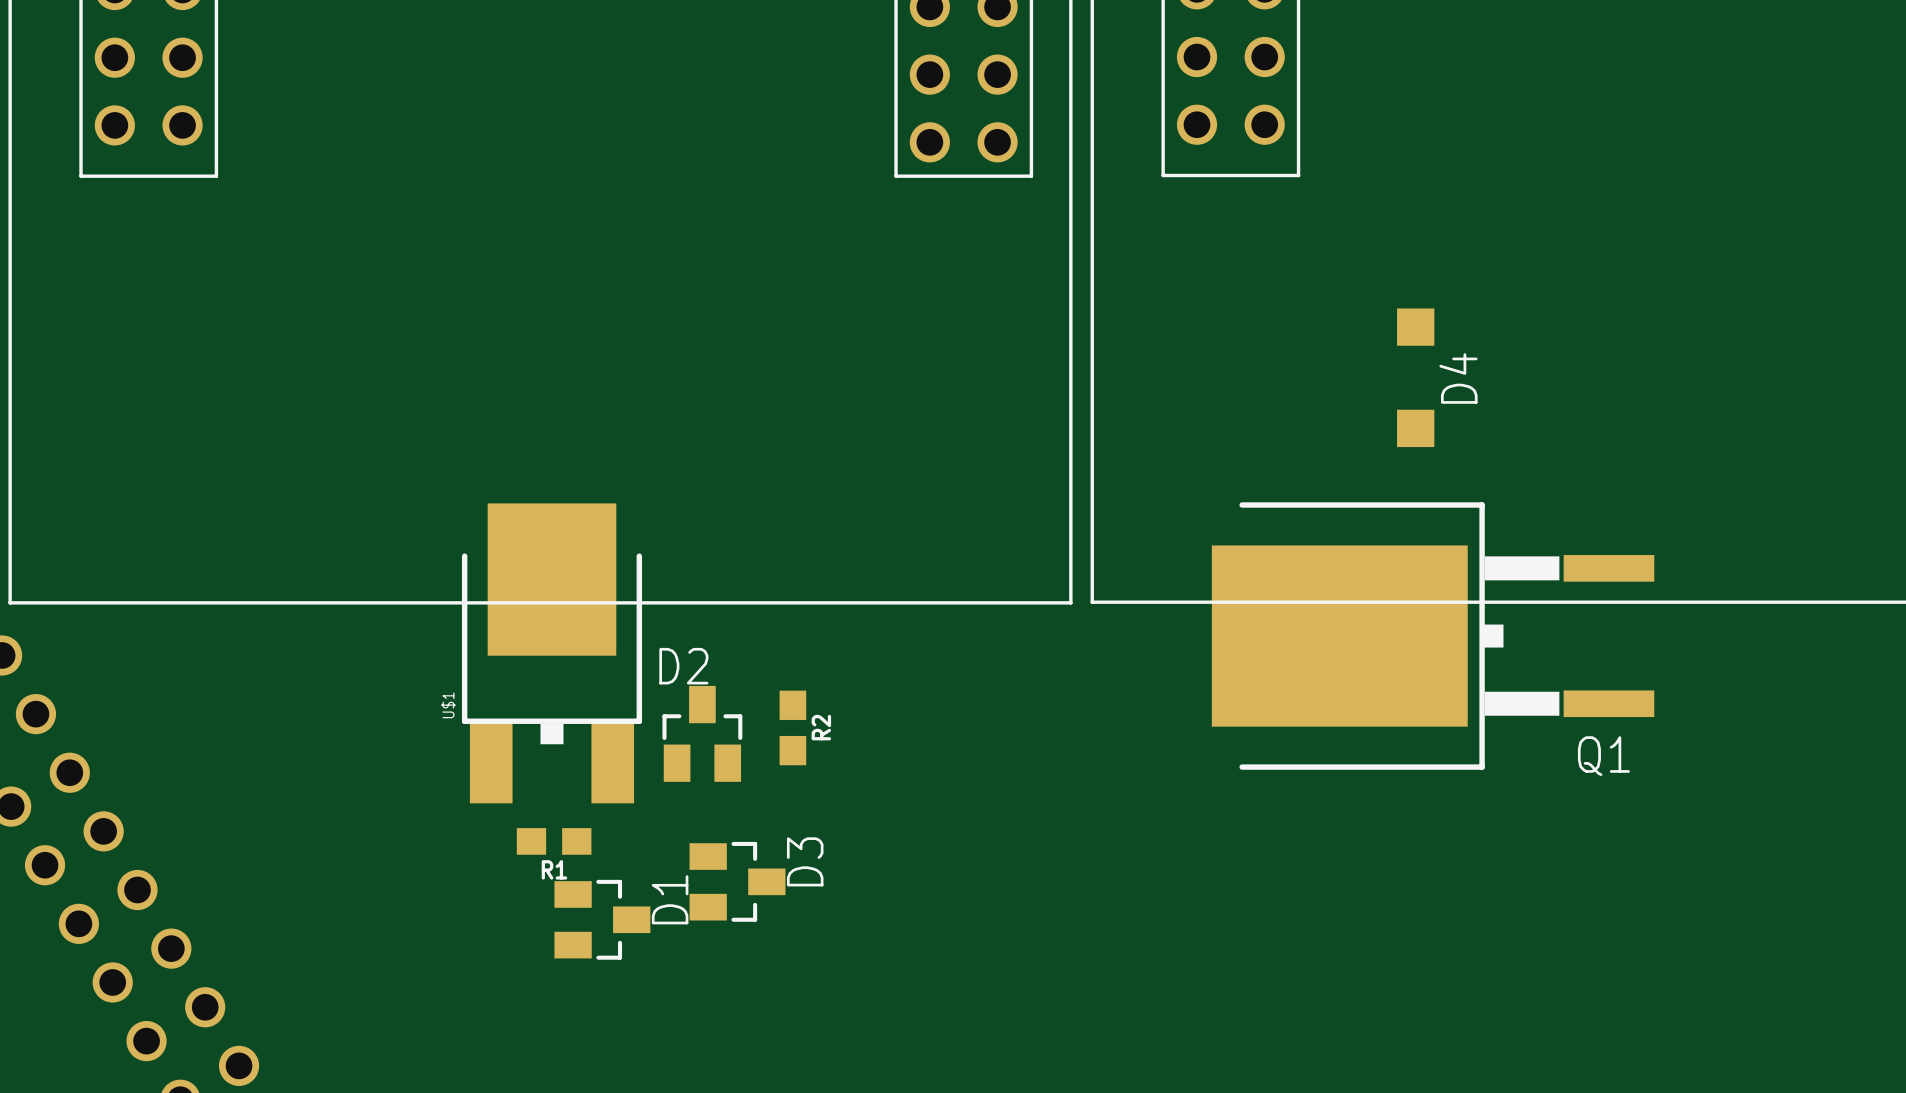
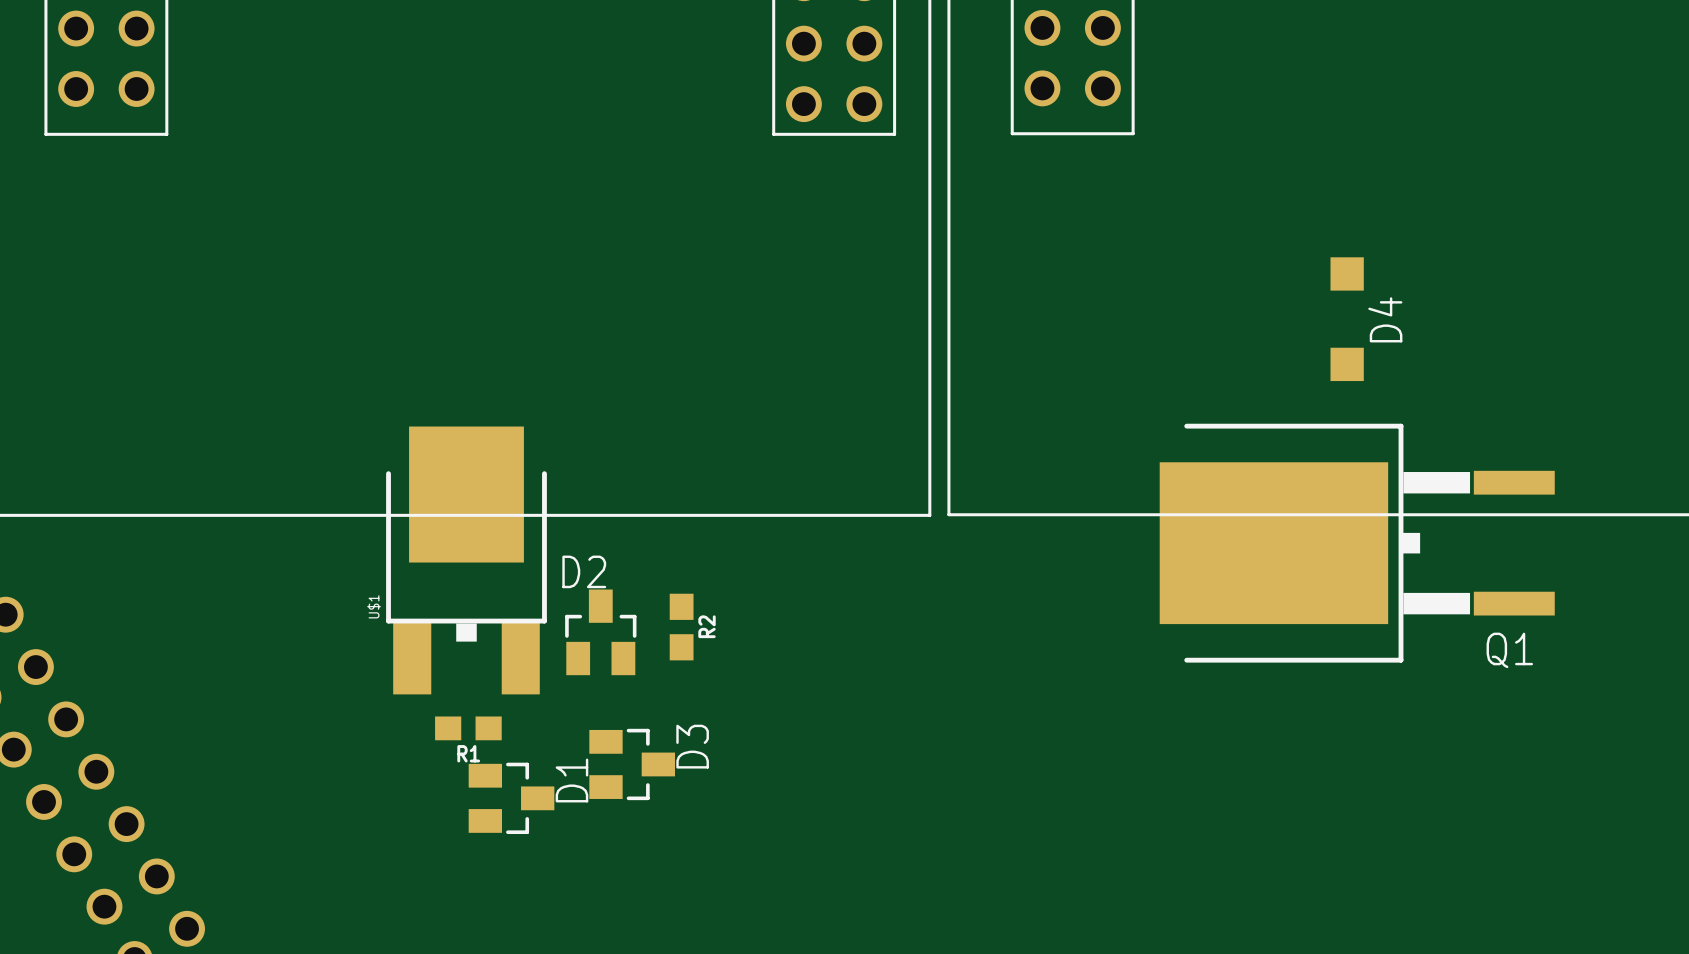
D4 position: (1415, 377) -> (1347, 319)
Q1 position: (1433, 636) -> (1357, 543)

